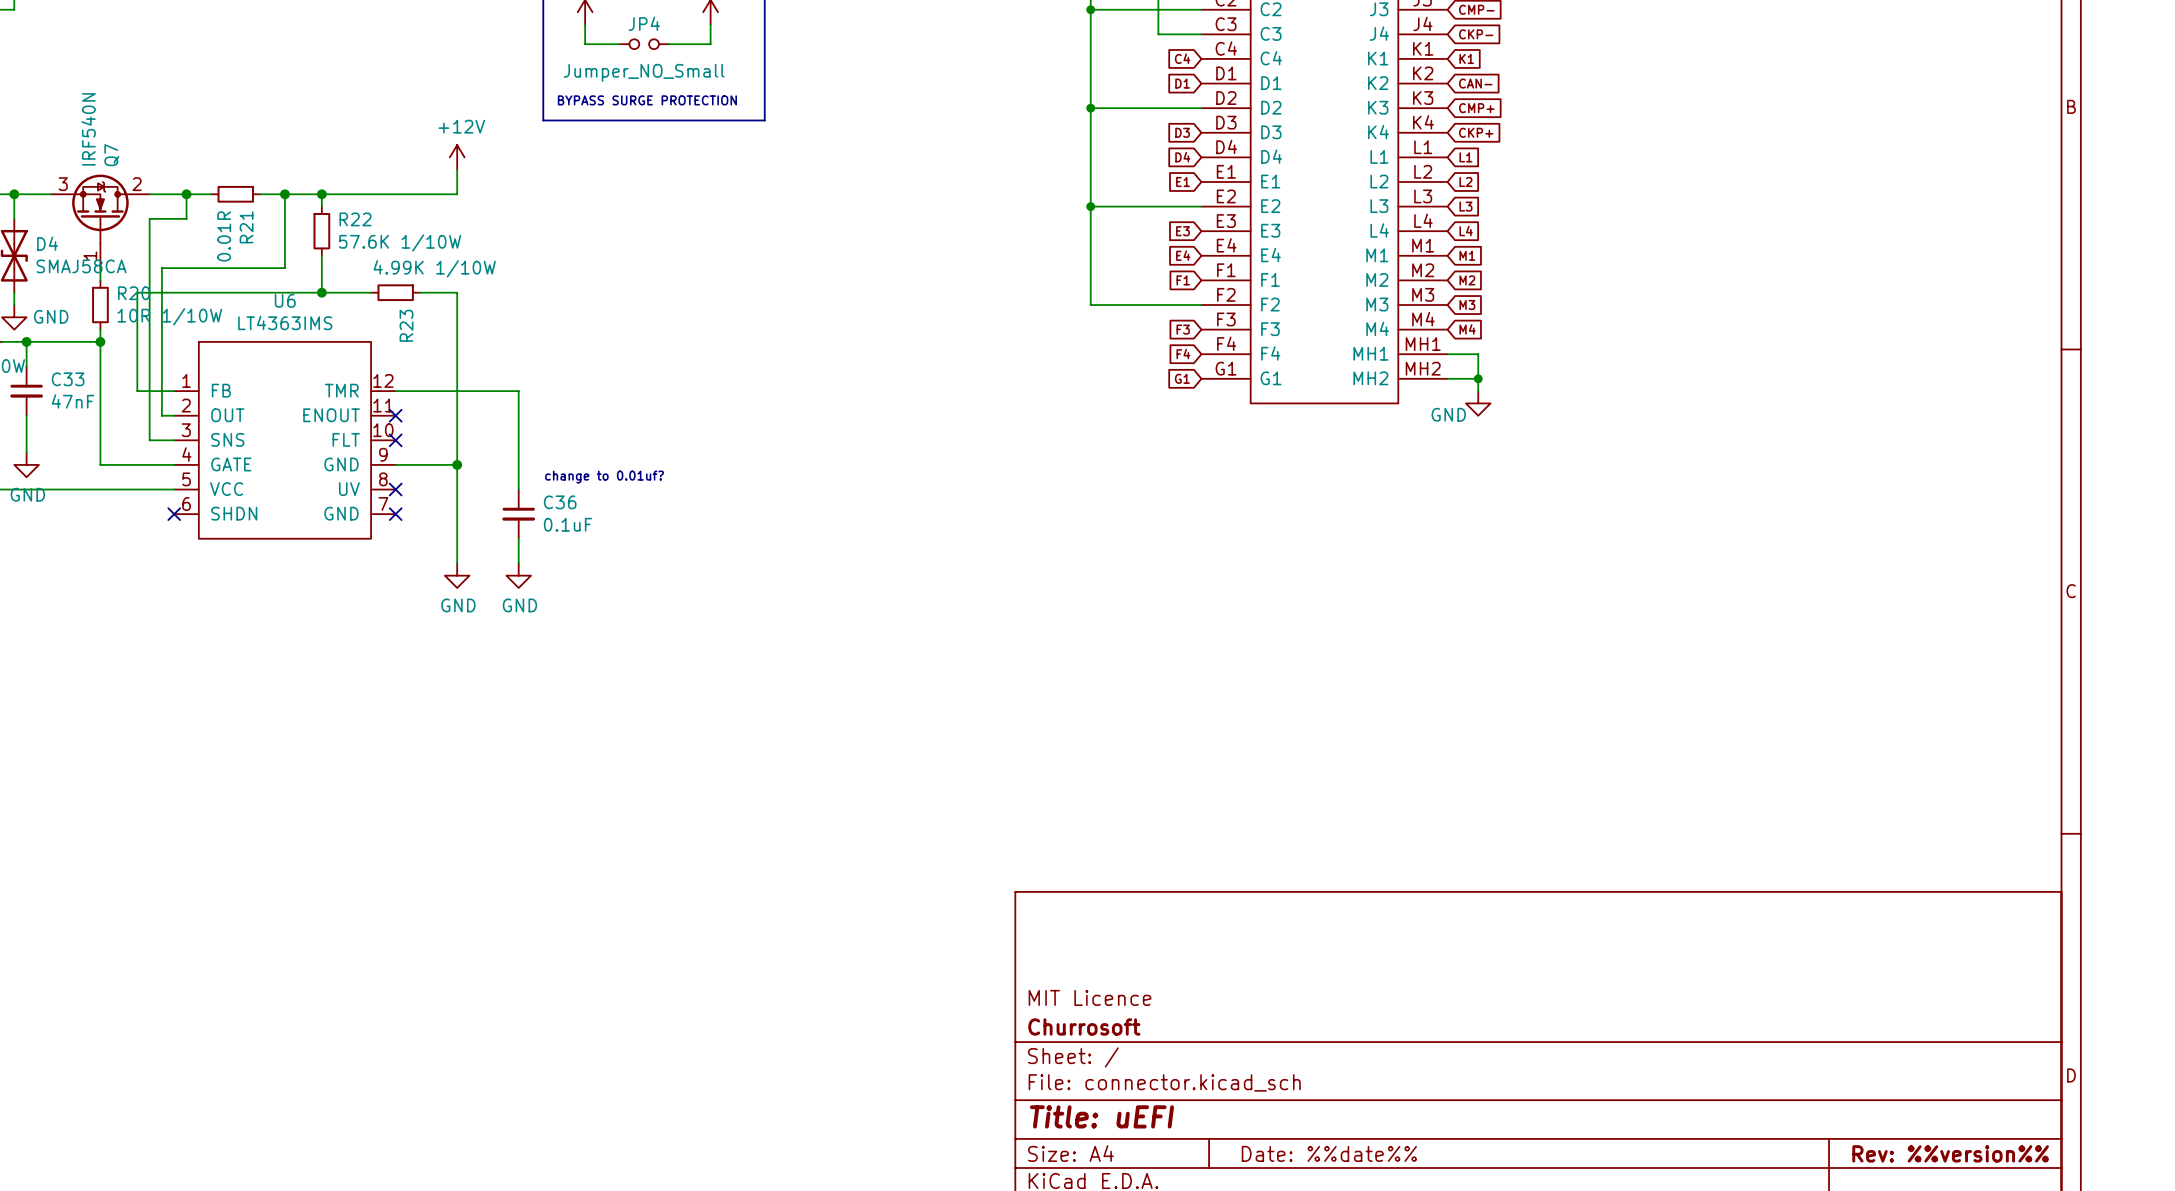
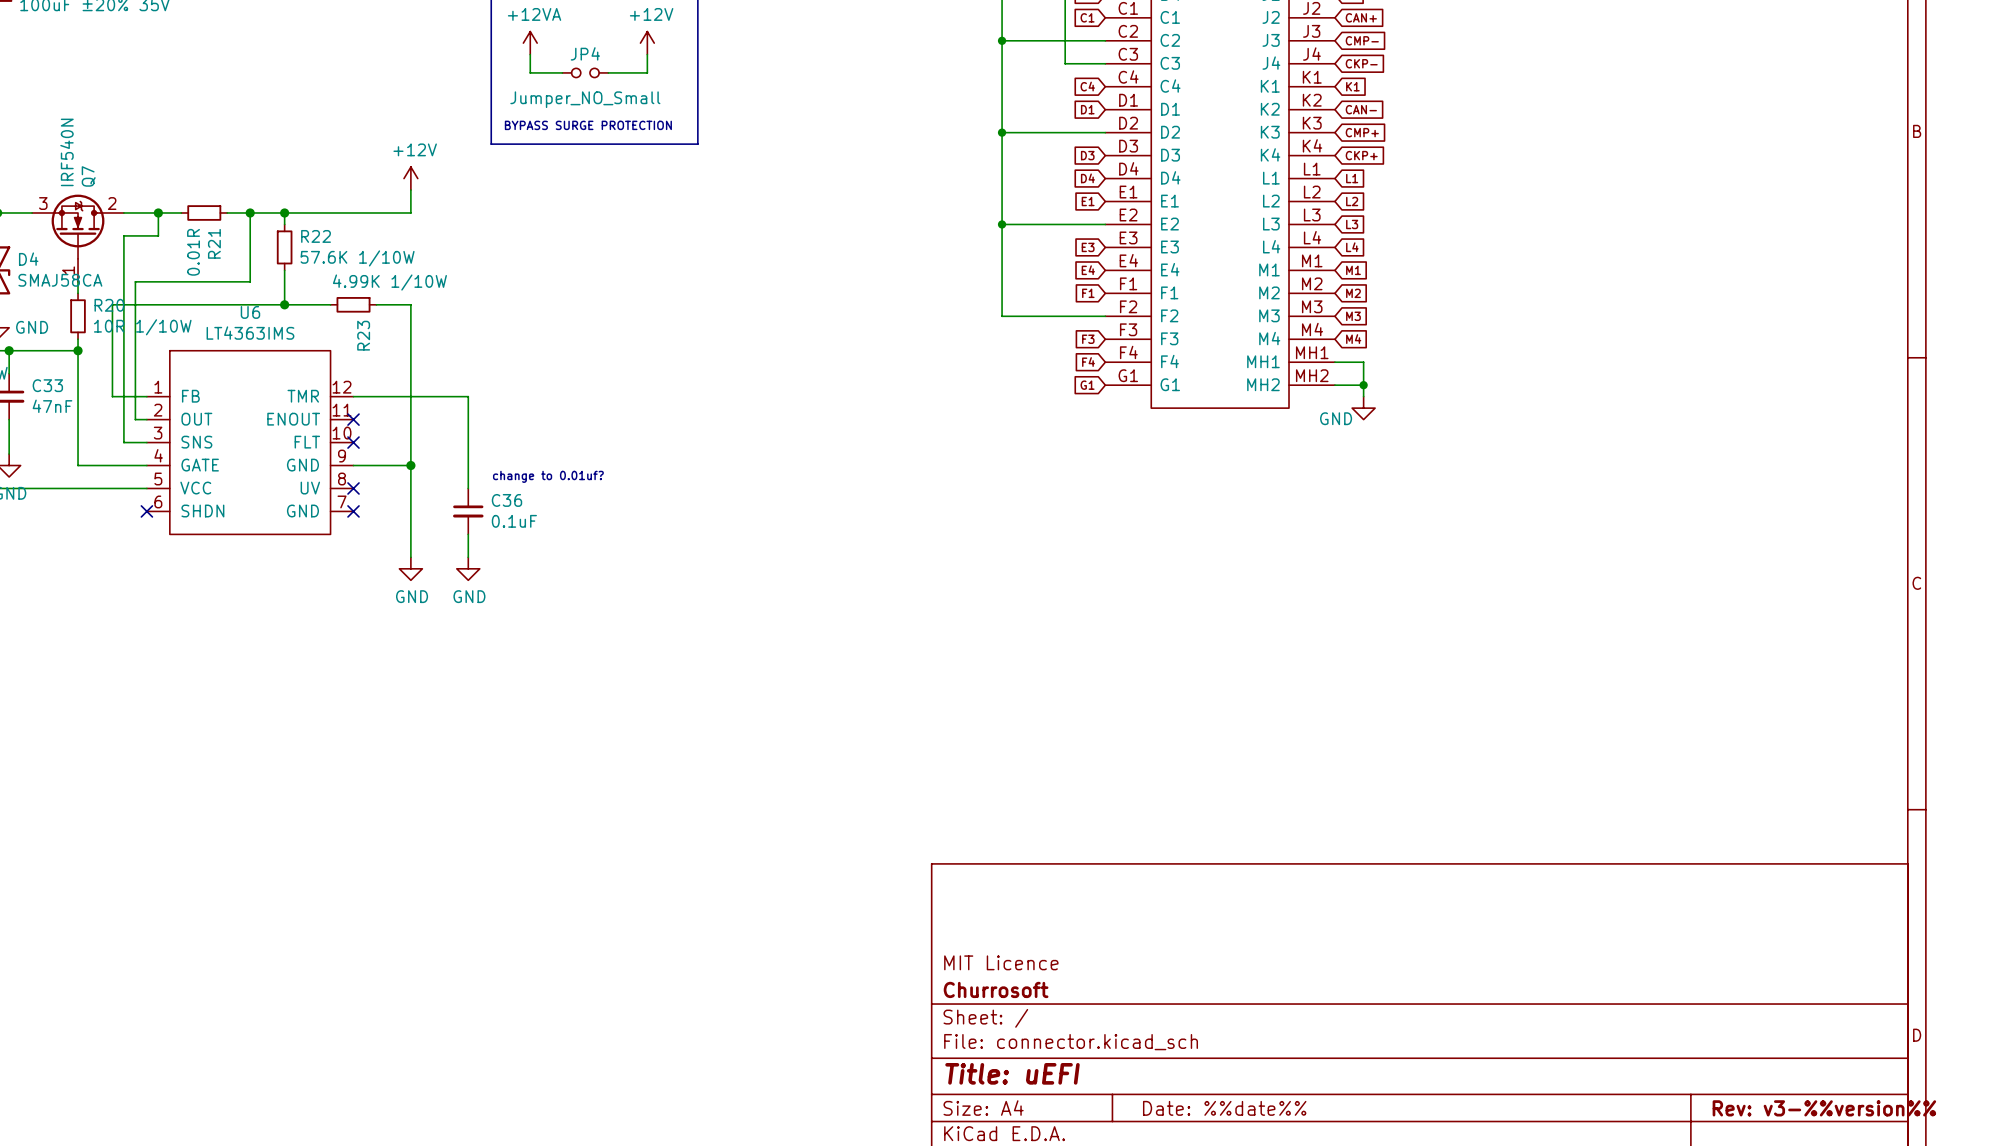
title block: Rev: %%version%% (1950, 1153) -> Rev: v3-%%version%% (1824, 1108)

